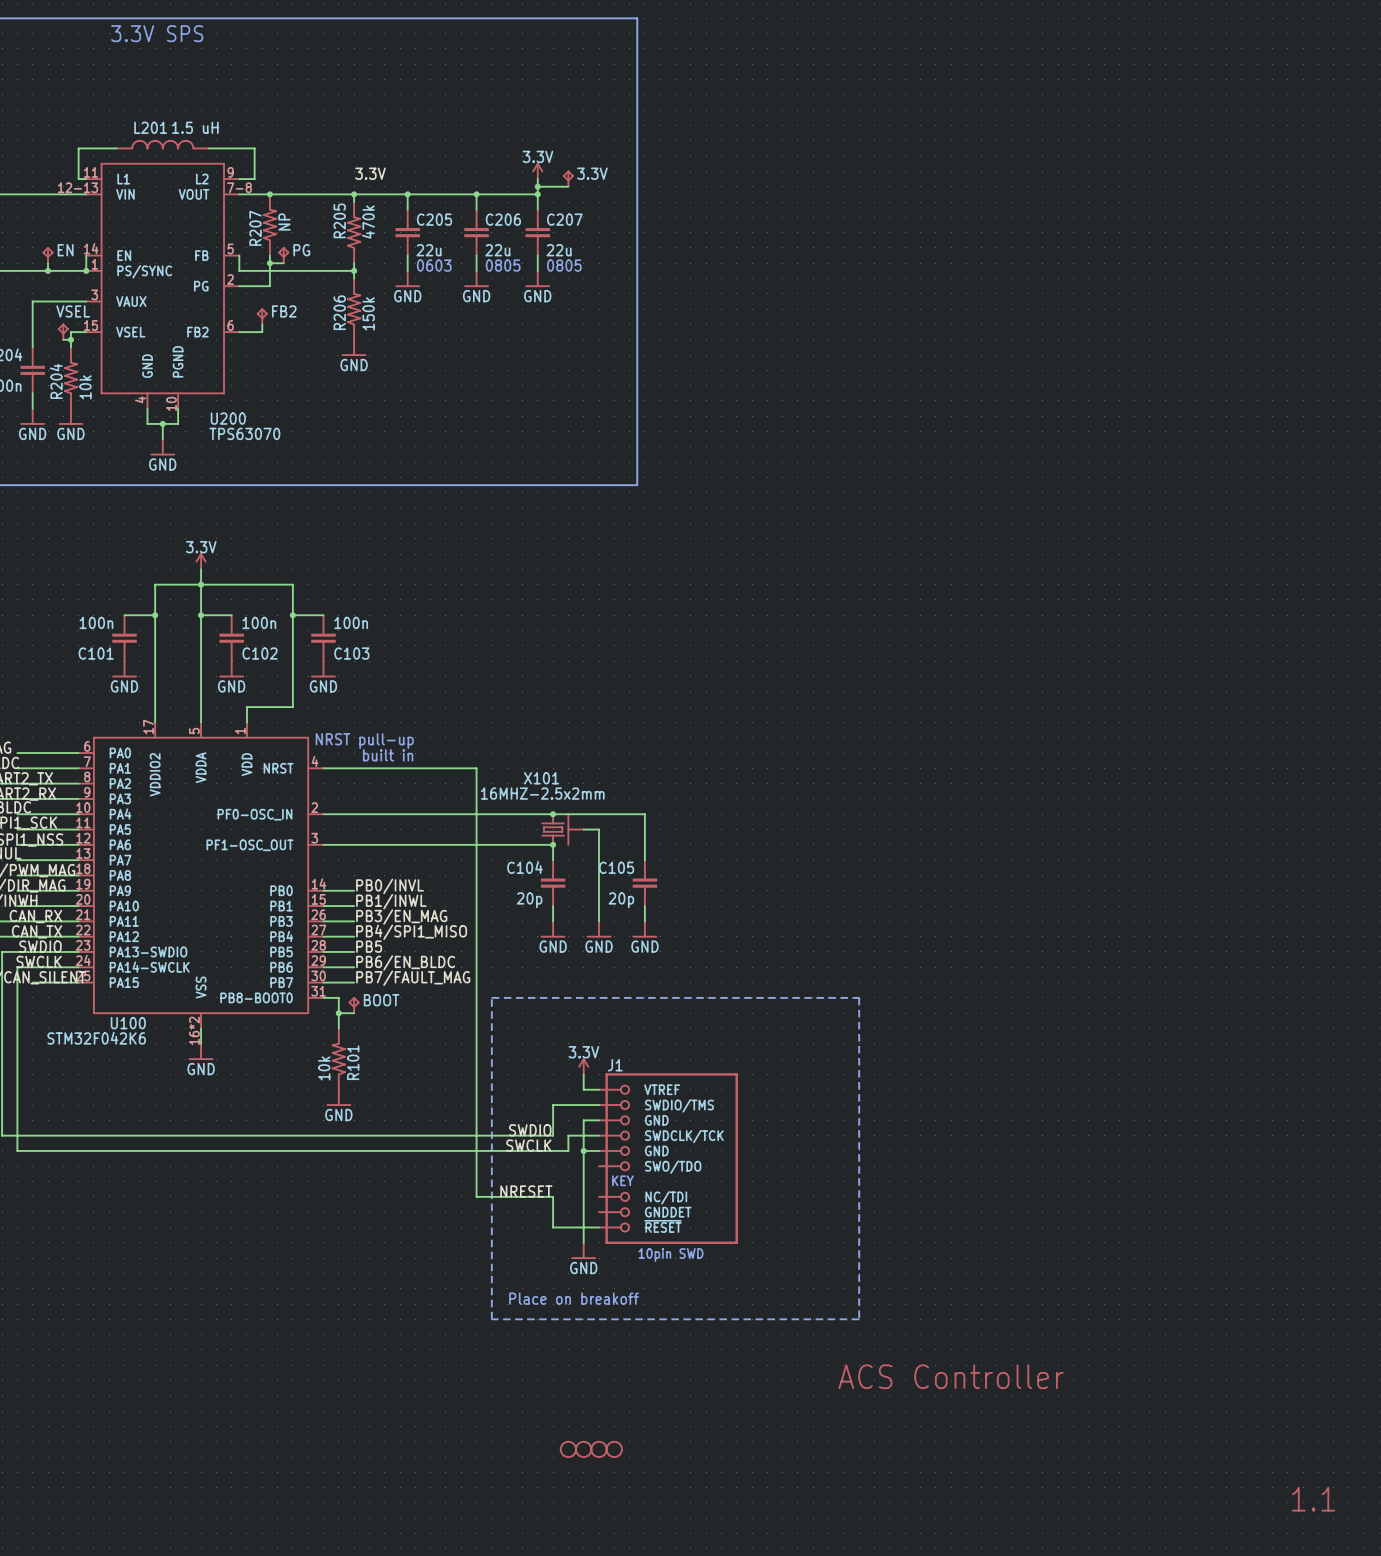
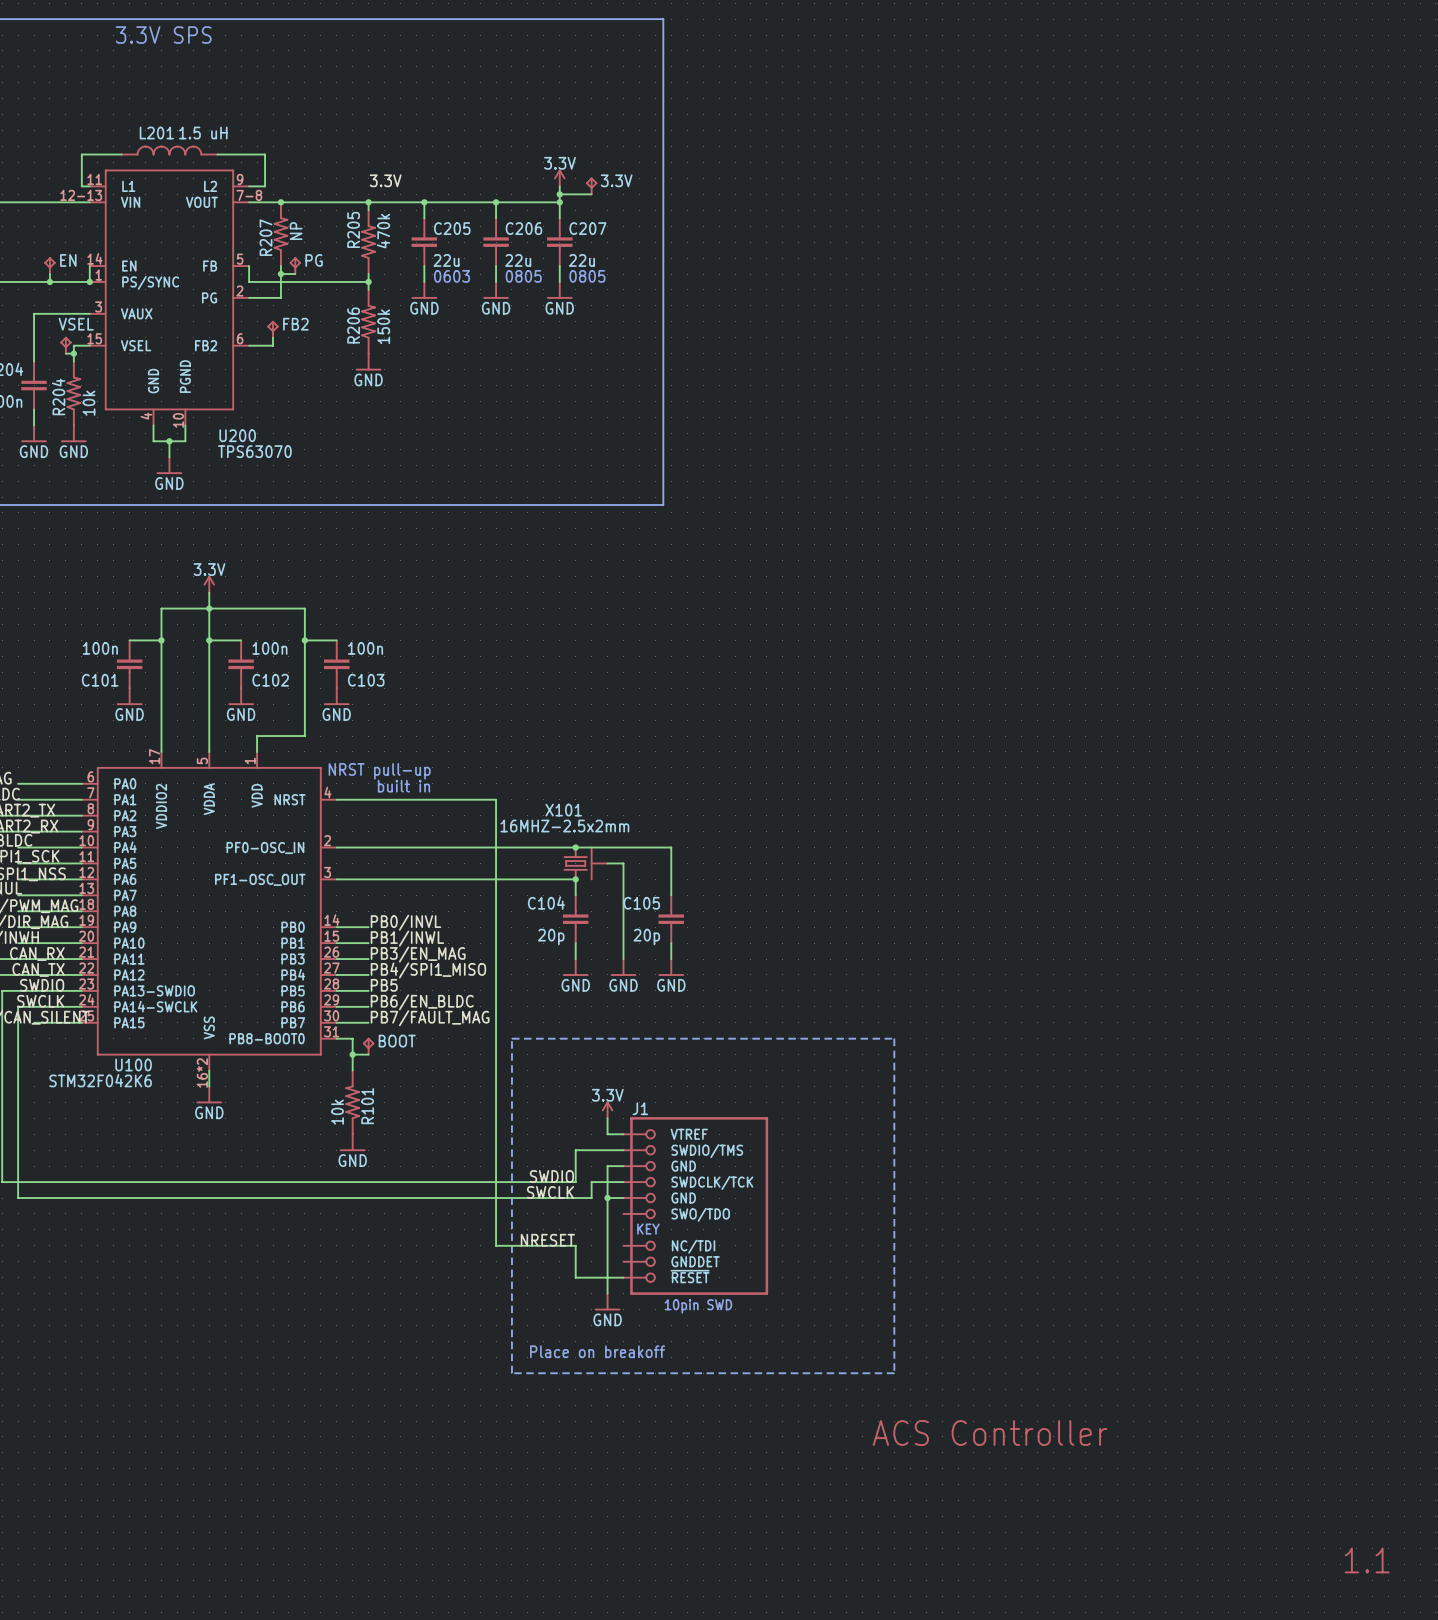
part: (568, 1449) -> none
part: (583, 1449) -> none
part: (599, 1449) -> none
part: (614, 1449) -> none

